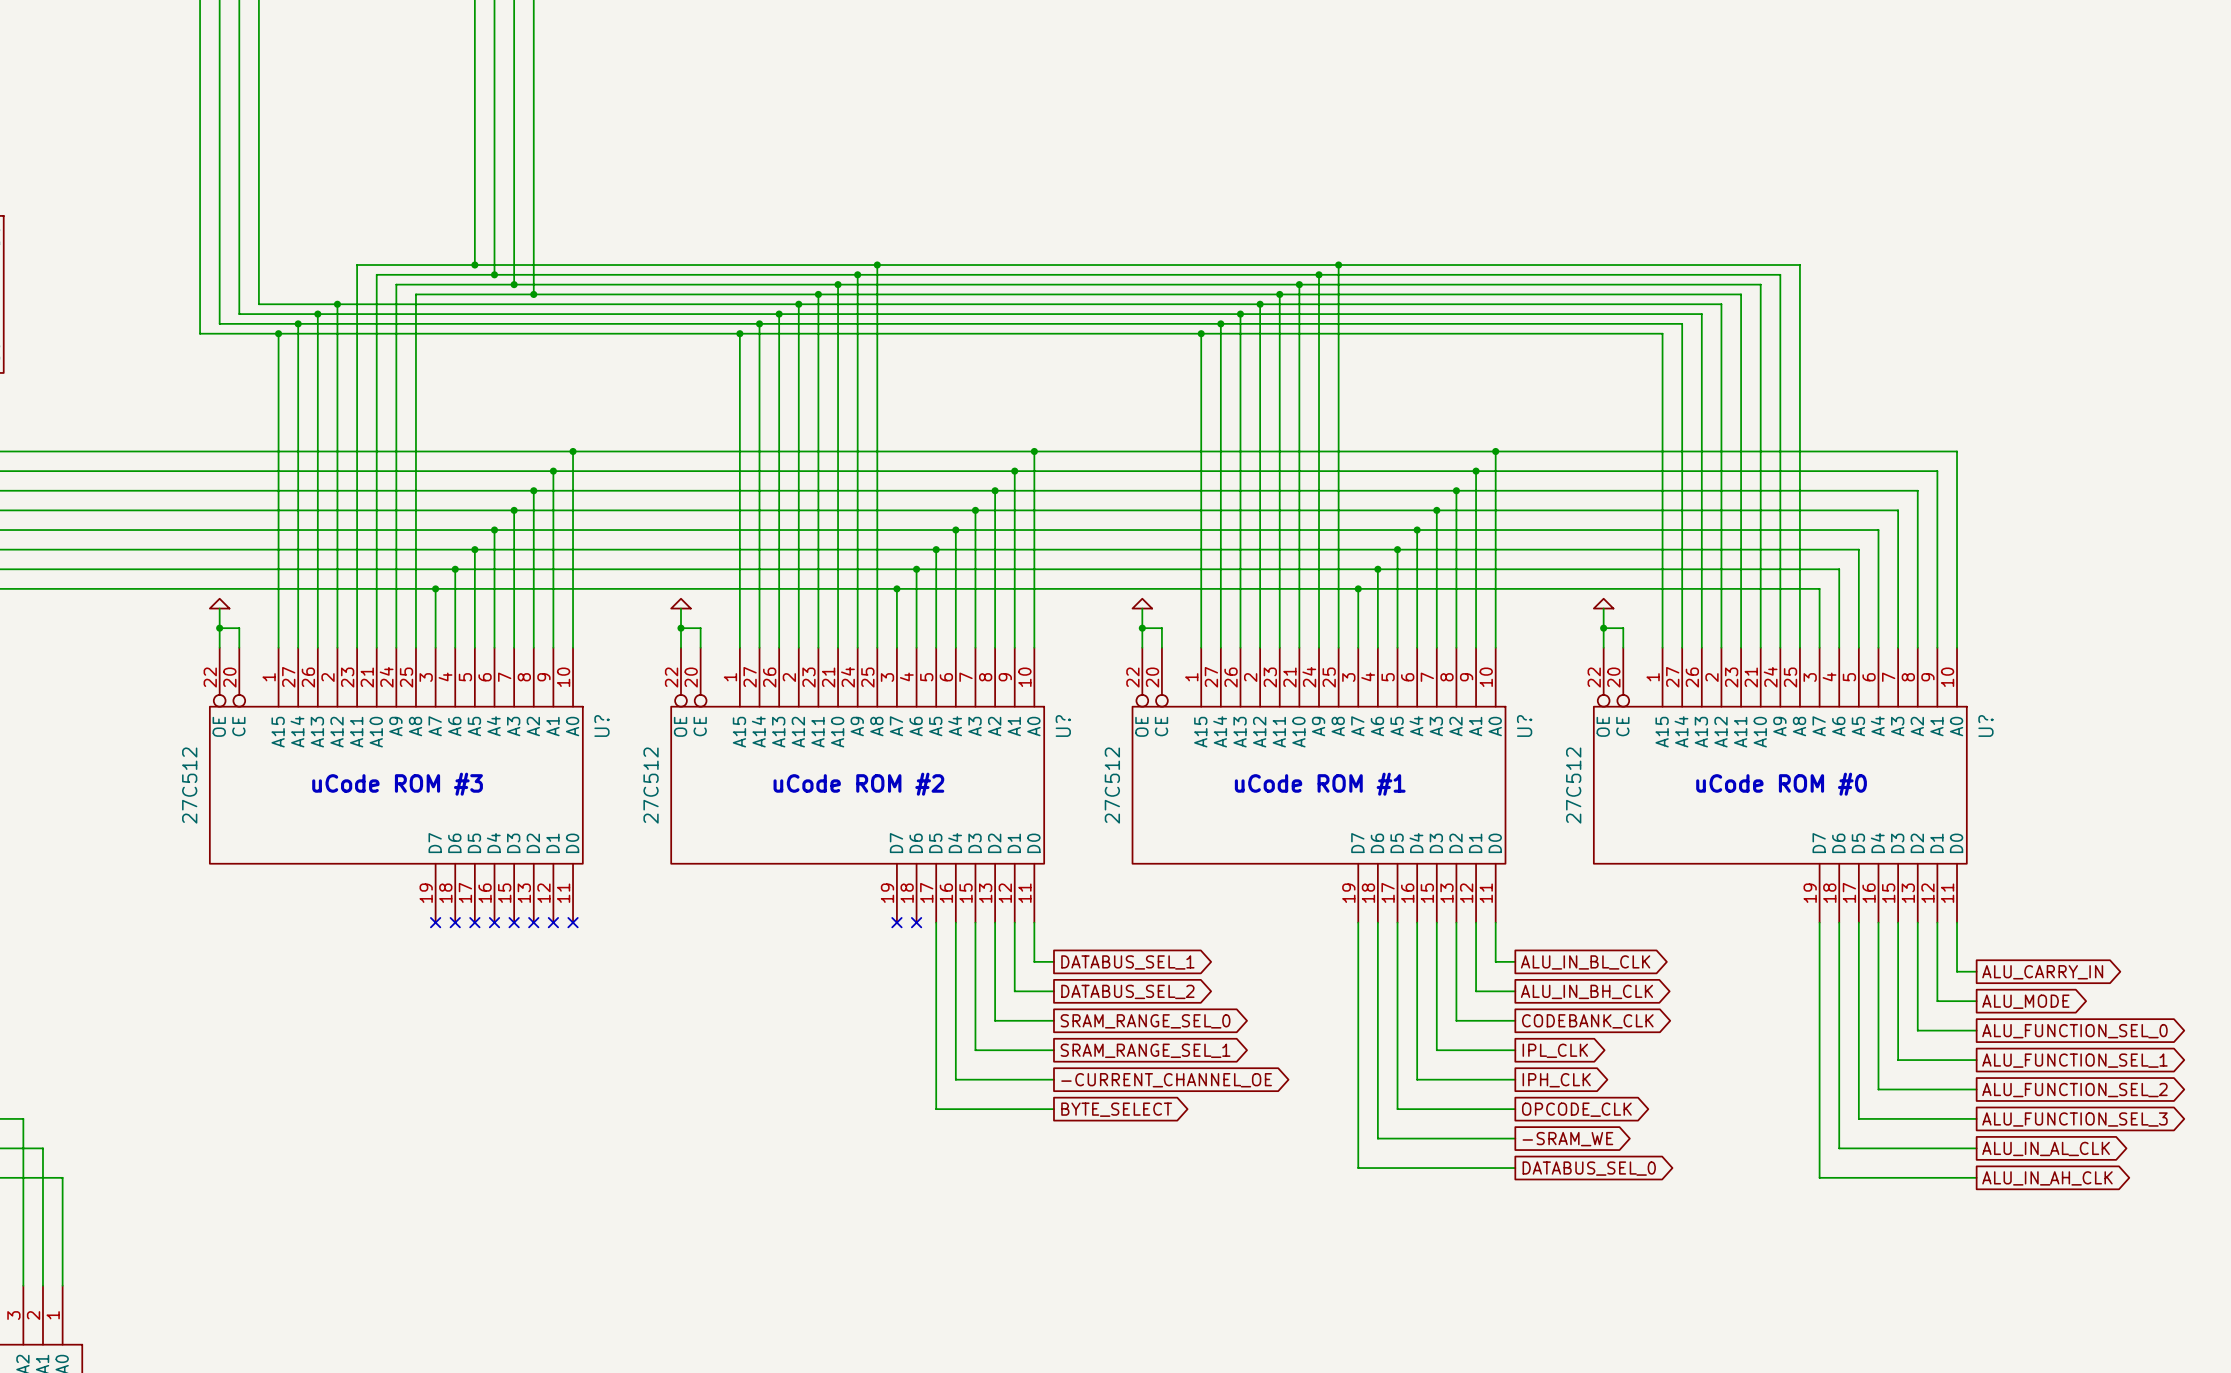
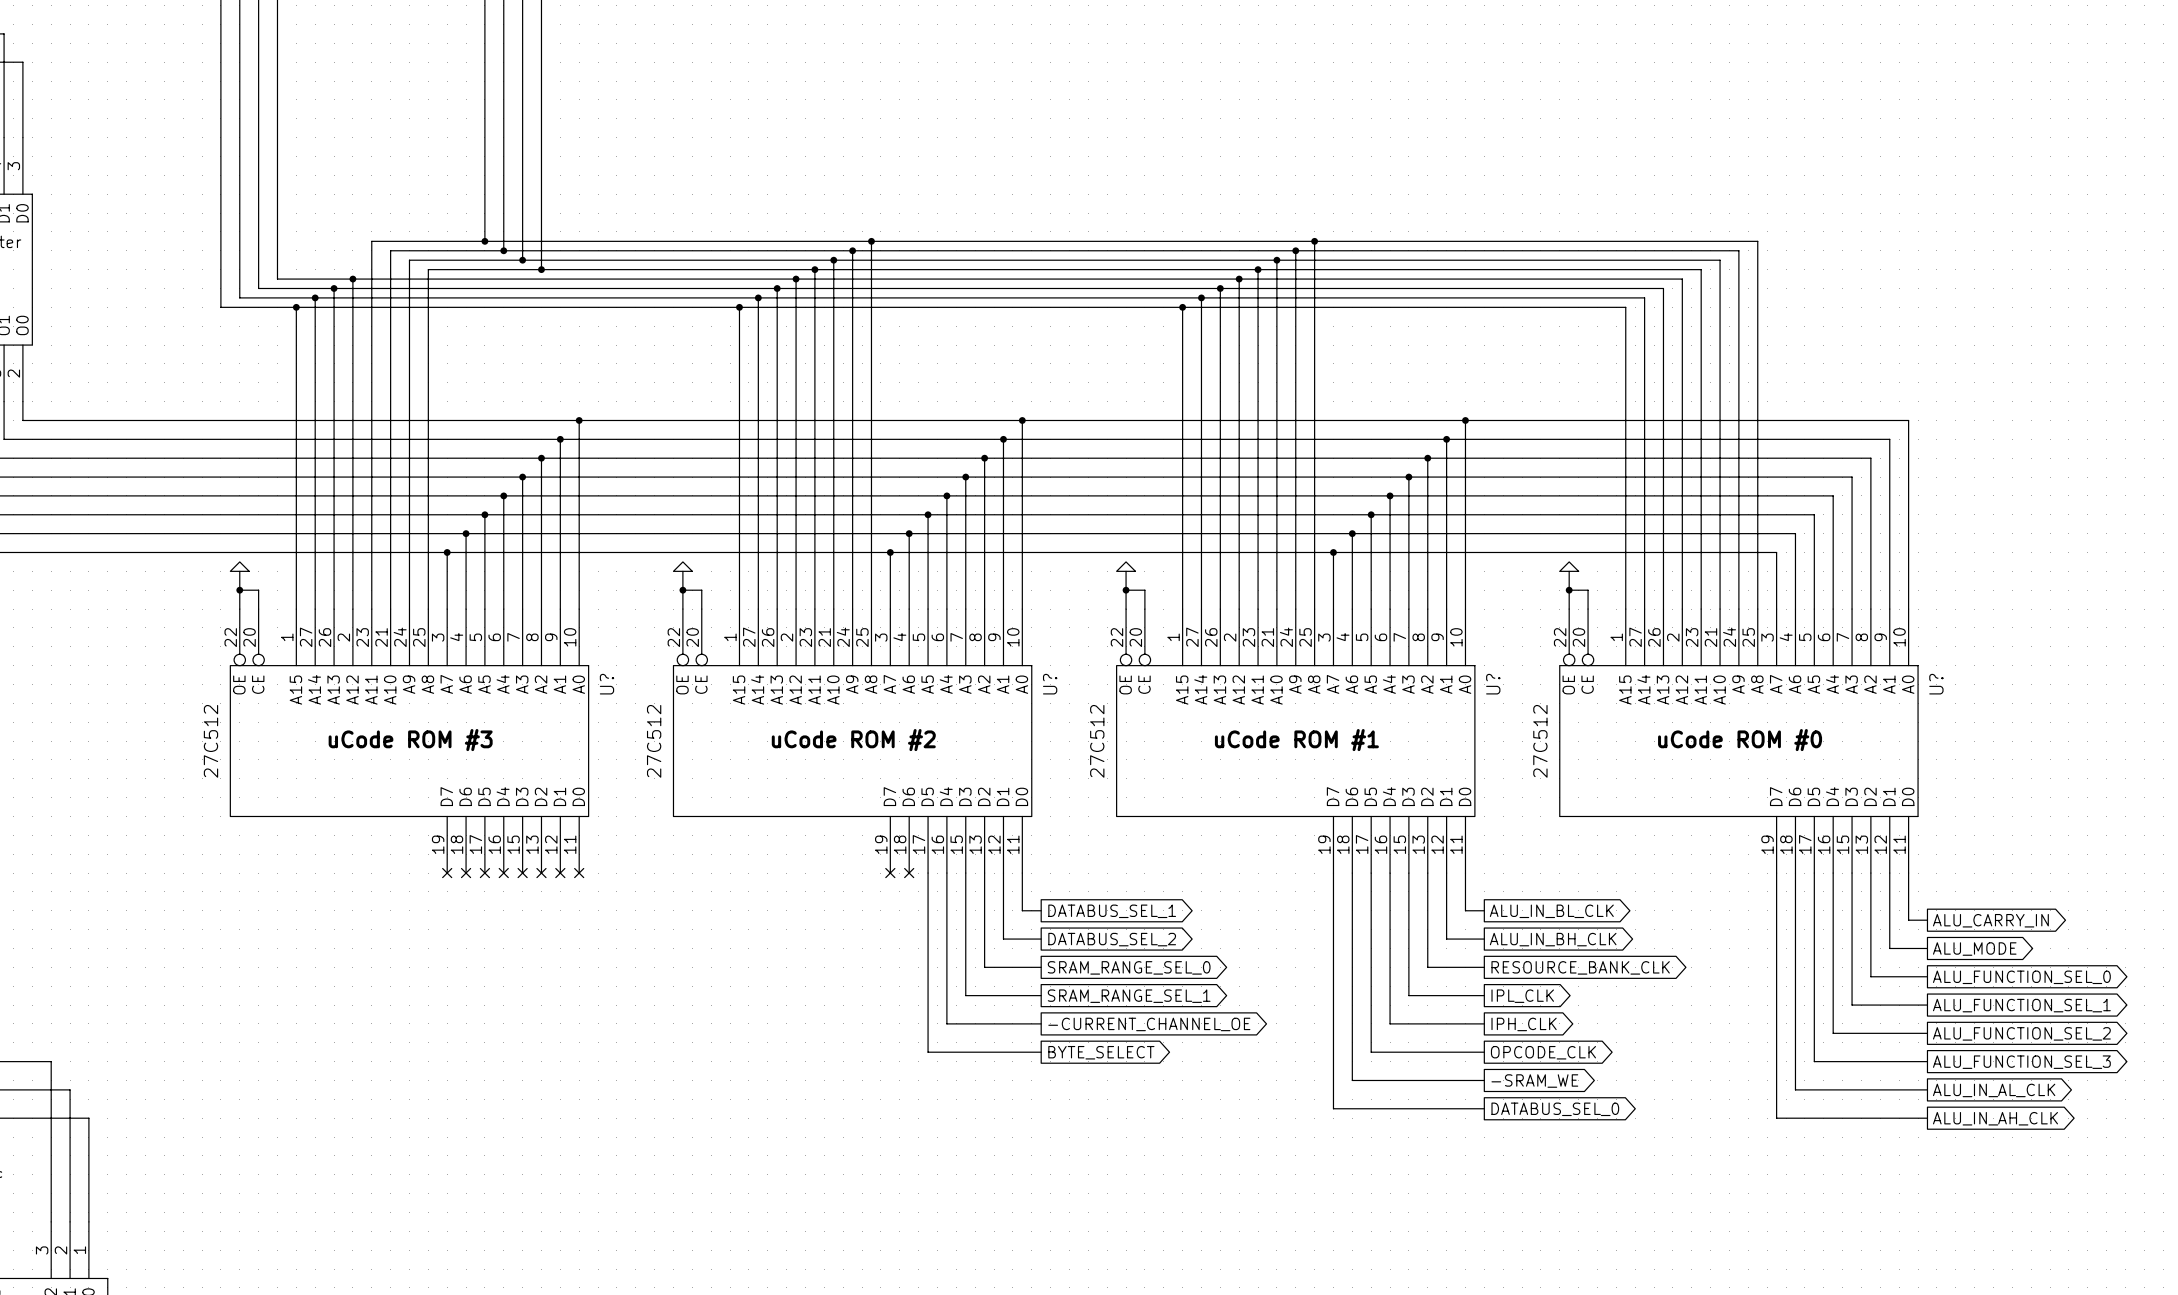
global label: CODEBANK_CLK (1587, 1021) -> RESOURCE_BANK_CLK (1580, 967)

